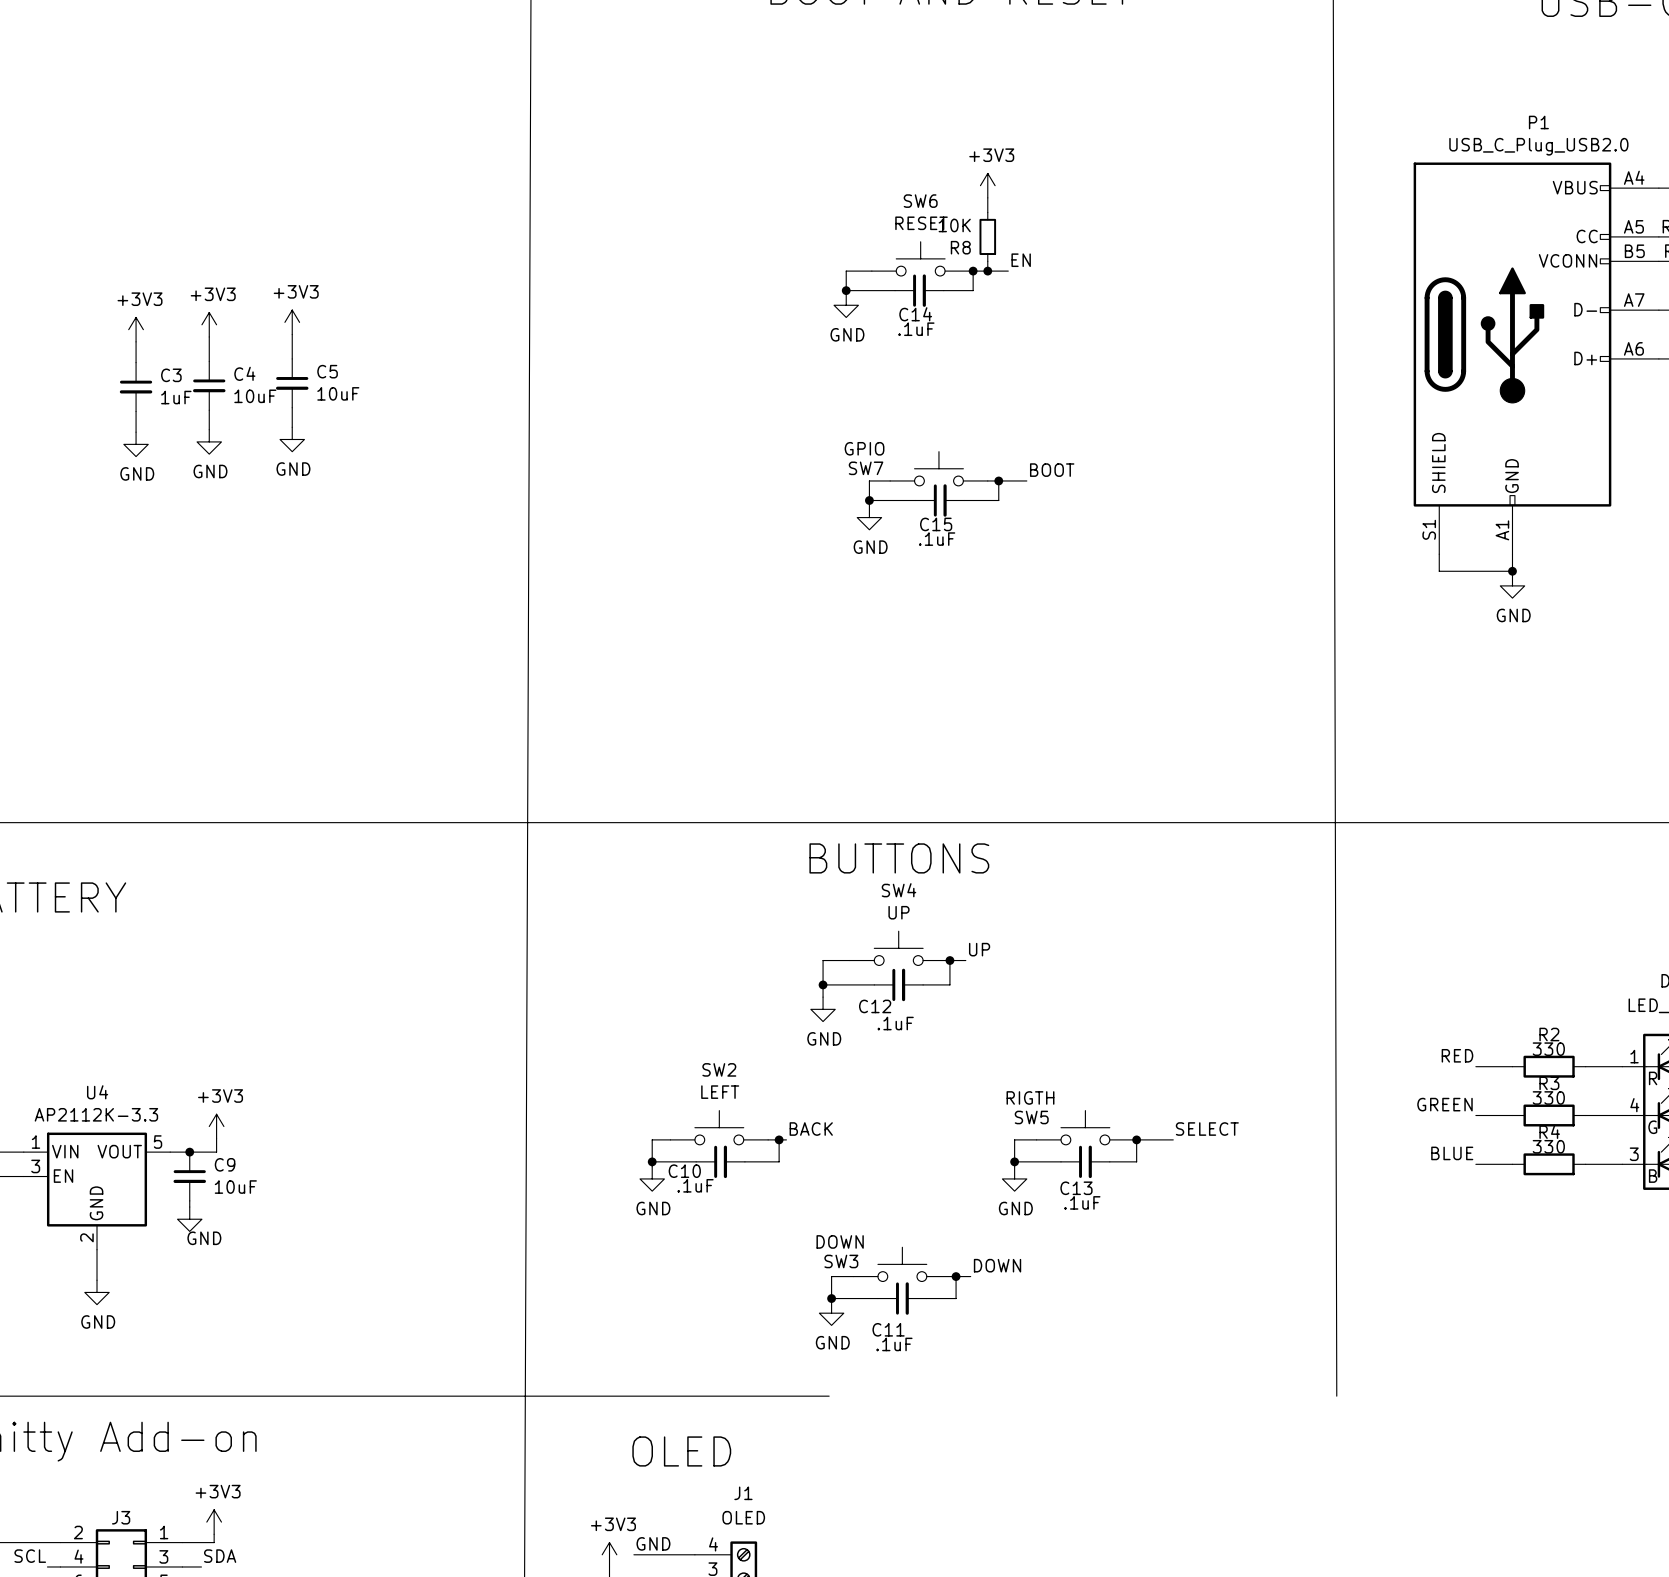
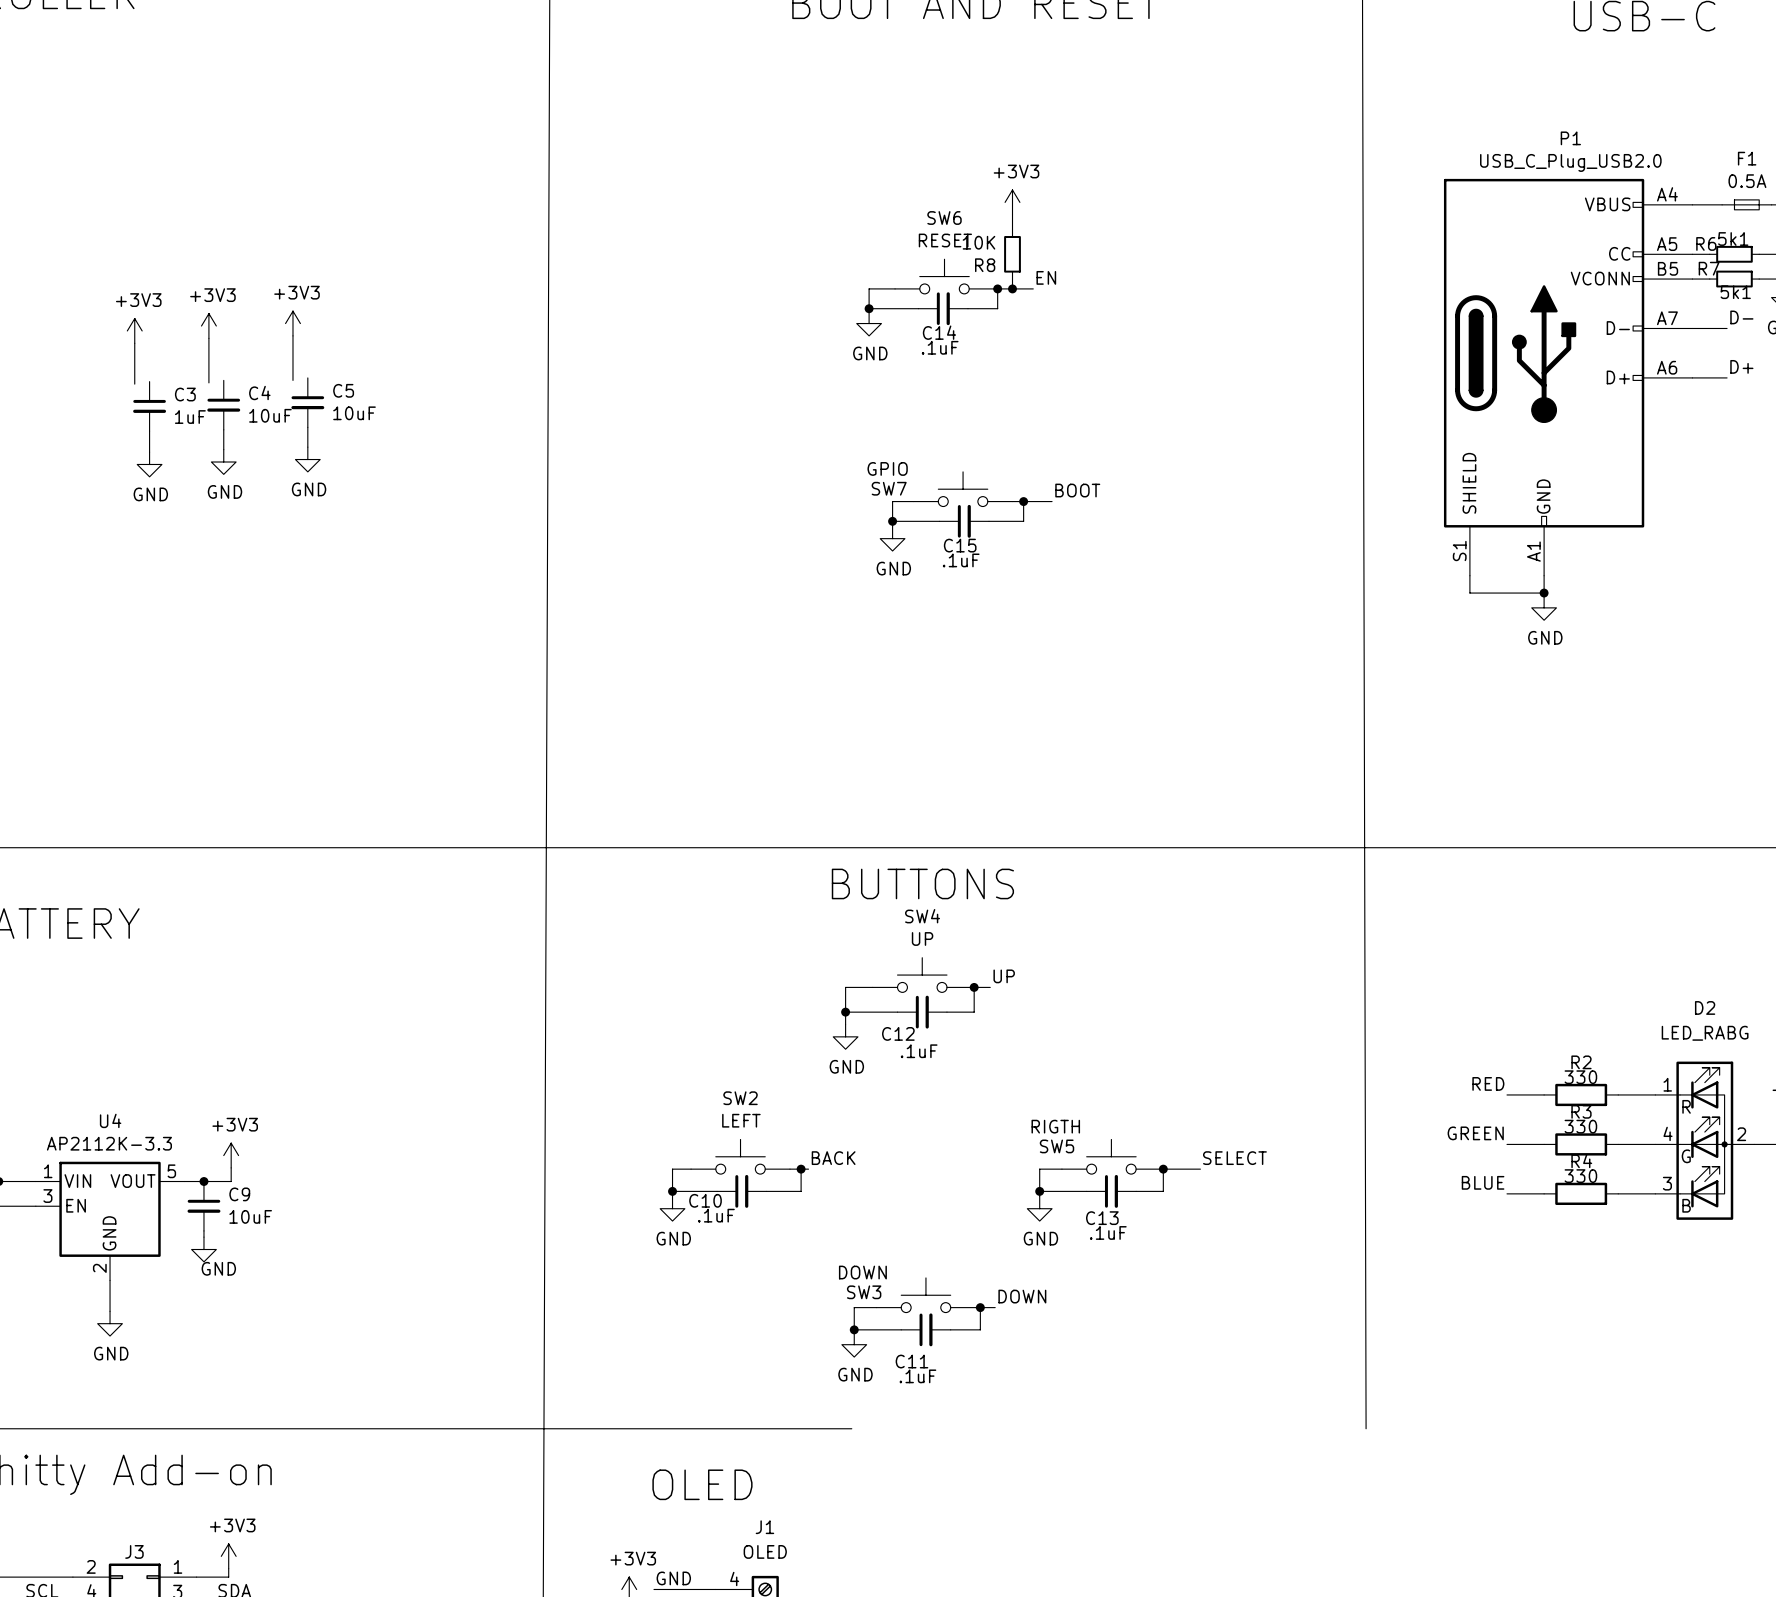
wire: none -> (292, 335) (292, 380)
wire: none -> (208, 338) (208, 382)
power symbol position: +3V3 (292, 322) -> +3V3 (292, 323)
wire: none -> (134, 343) (134, 384)
power symbol position: +3V3 (209, 324) -> +3V3 (208, 326)
power symbol position: +3V3 (136, 329) -> +3V3 (134, 330)
wire: (292, 334) (292, 358) -> none
wire: (209, 336) (209, 361) -> none
wire: (136, 341) (136, 362) -> none

